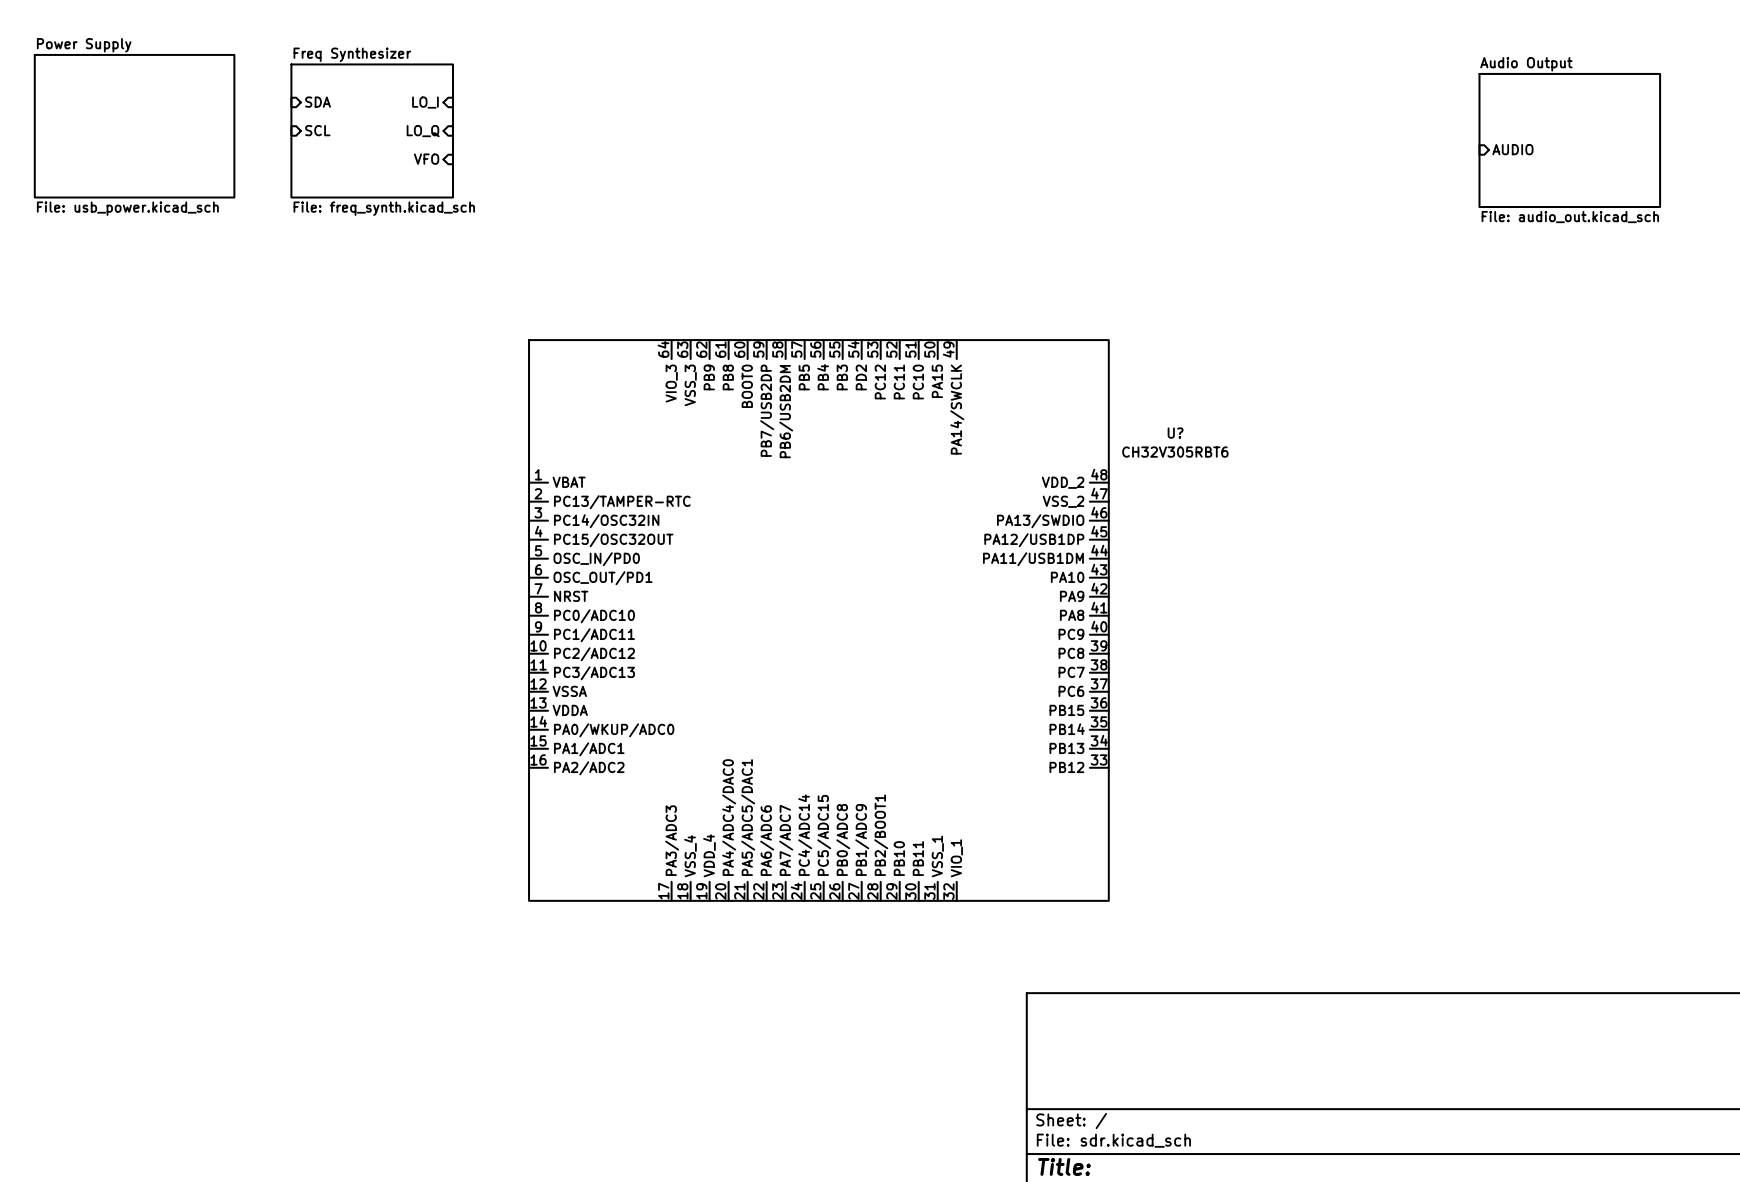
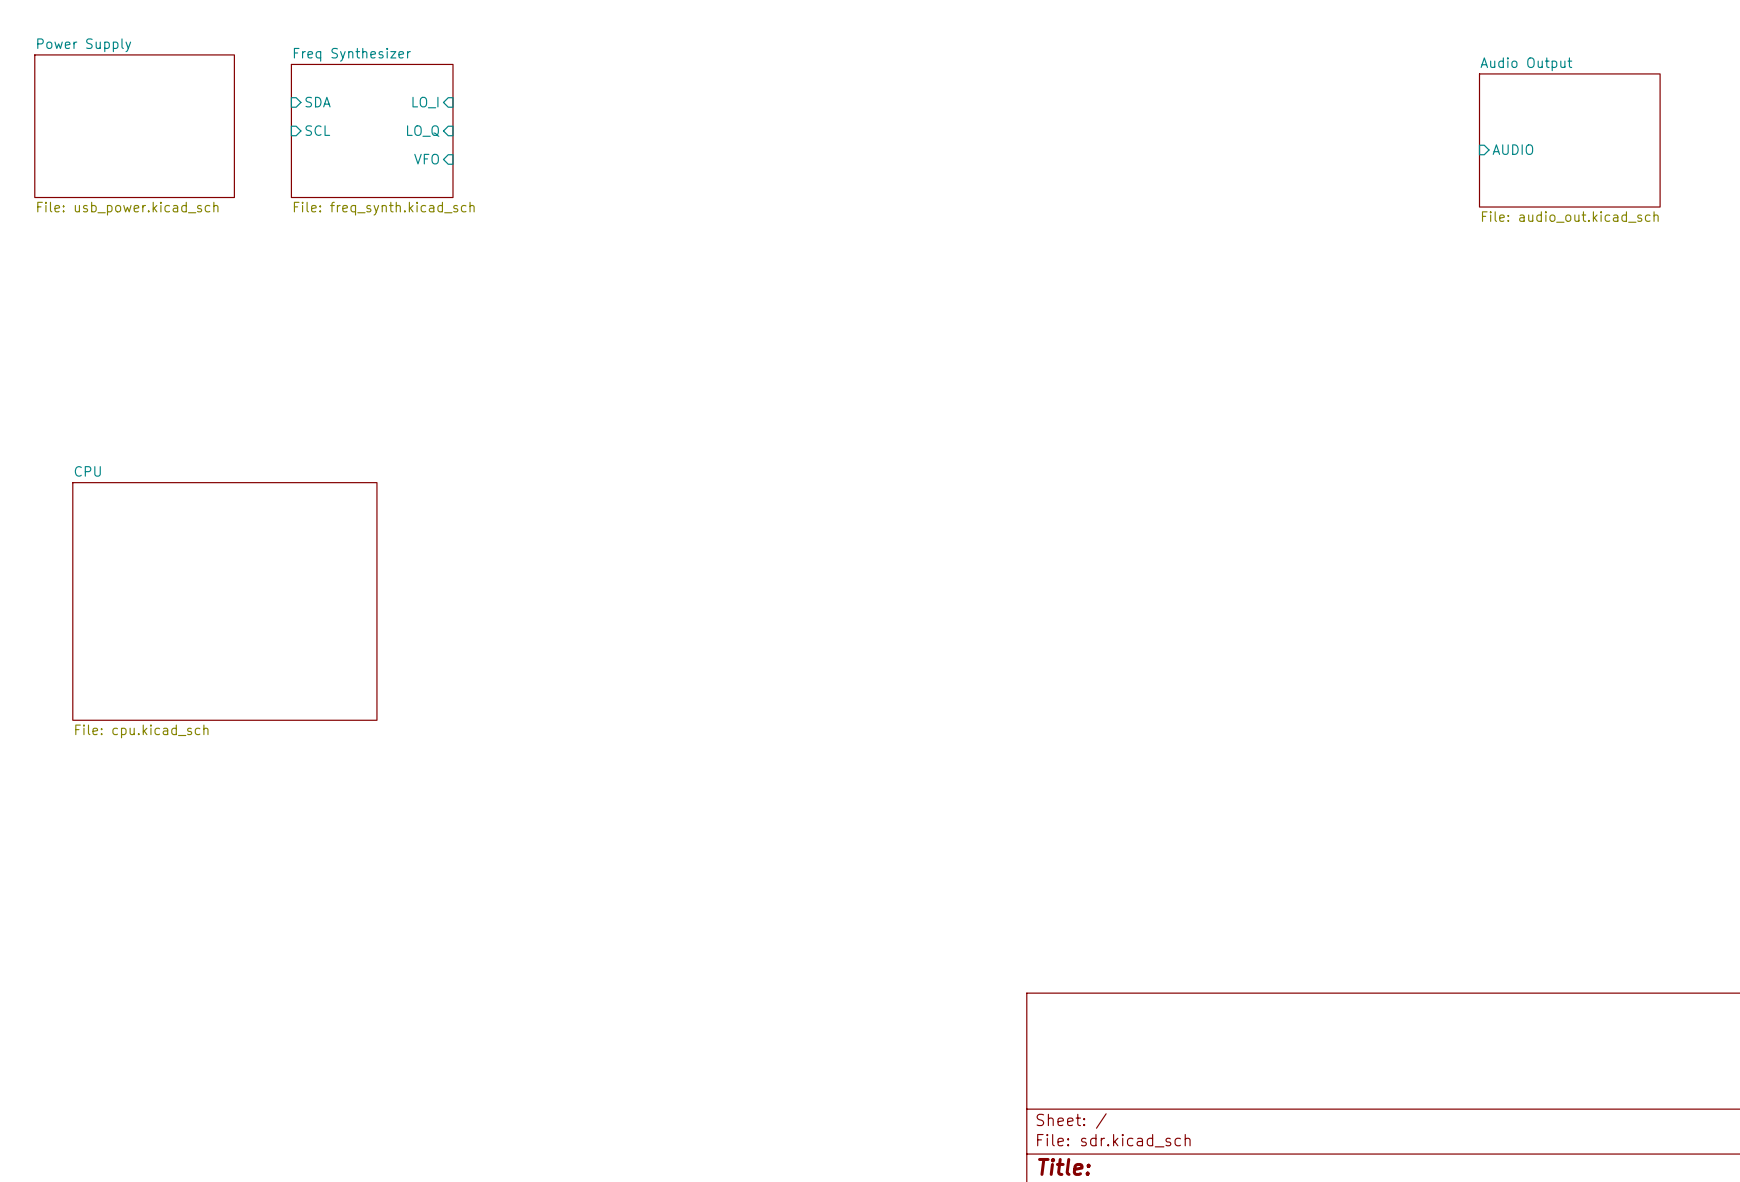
sheet CPU: none -> File: cpu.kicad_sch (224, 601)
U?: CH32V305RBT6 (818, 620) -> none

